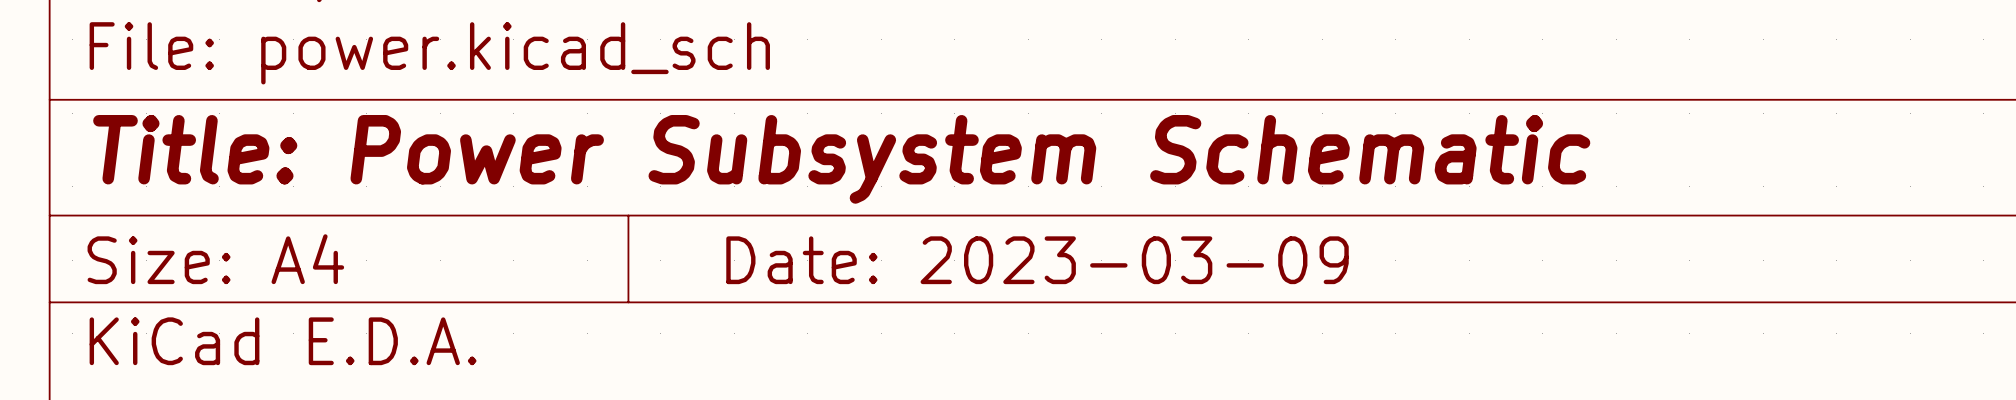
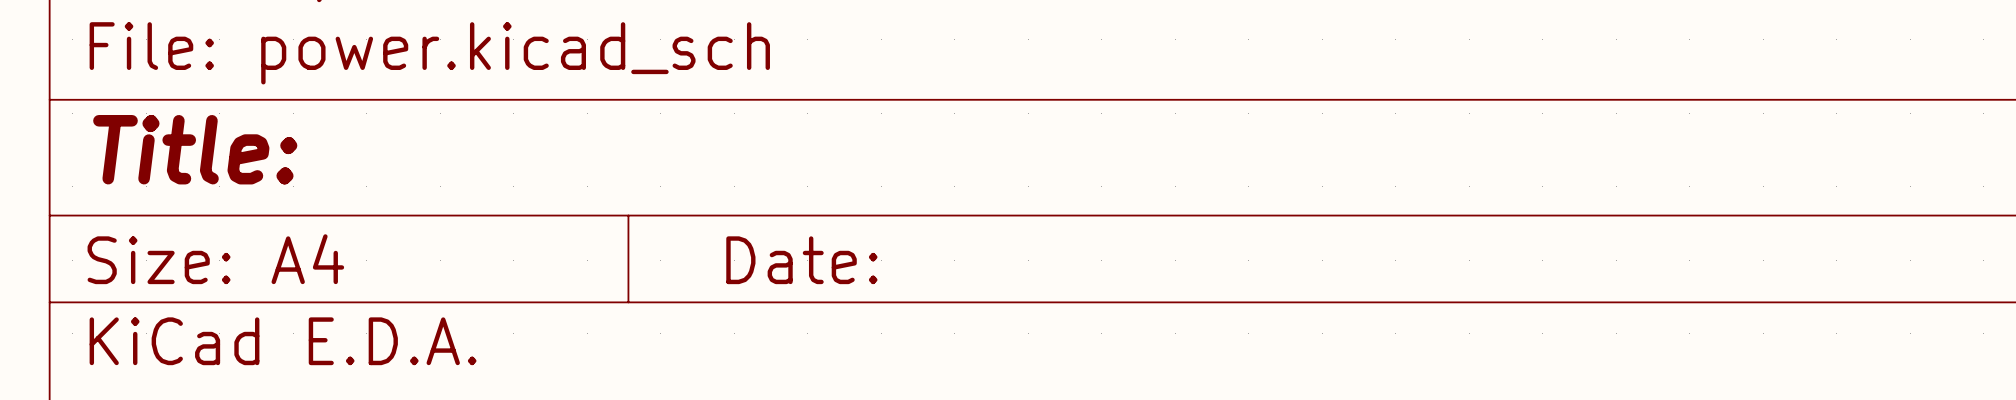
title block: Title: Power Subsystem Schematic (841, 159) -> Title: (195, 149)
title block: Date: 2023-03-09 (1037, 260) -> Date: (801, 260)

